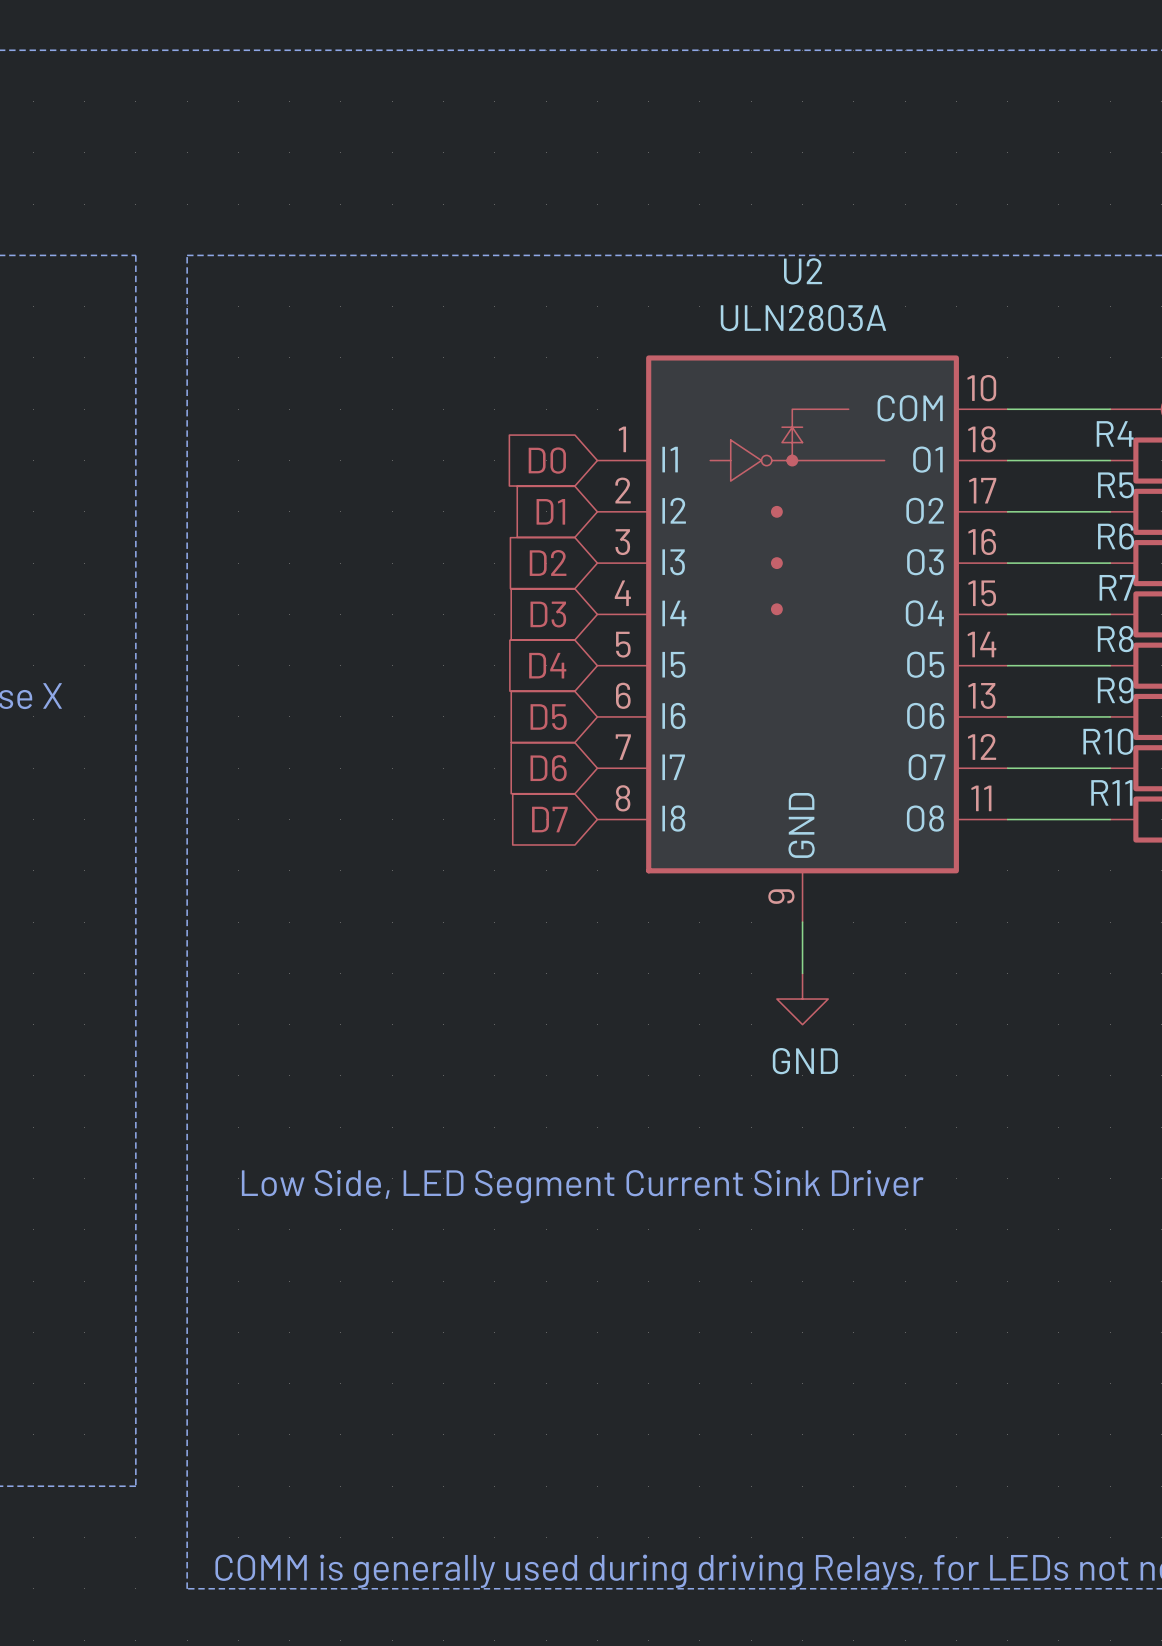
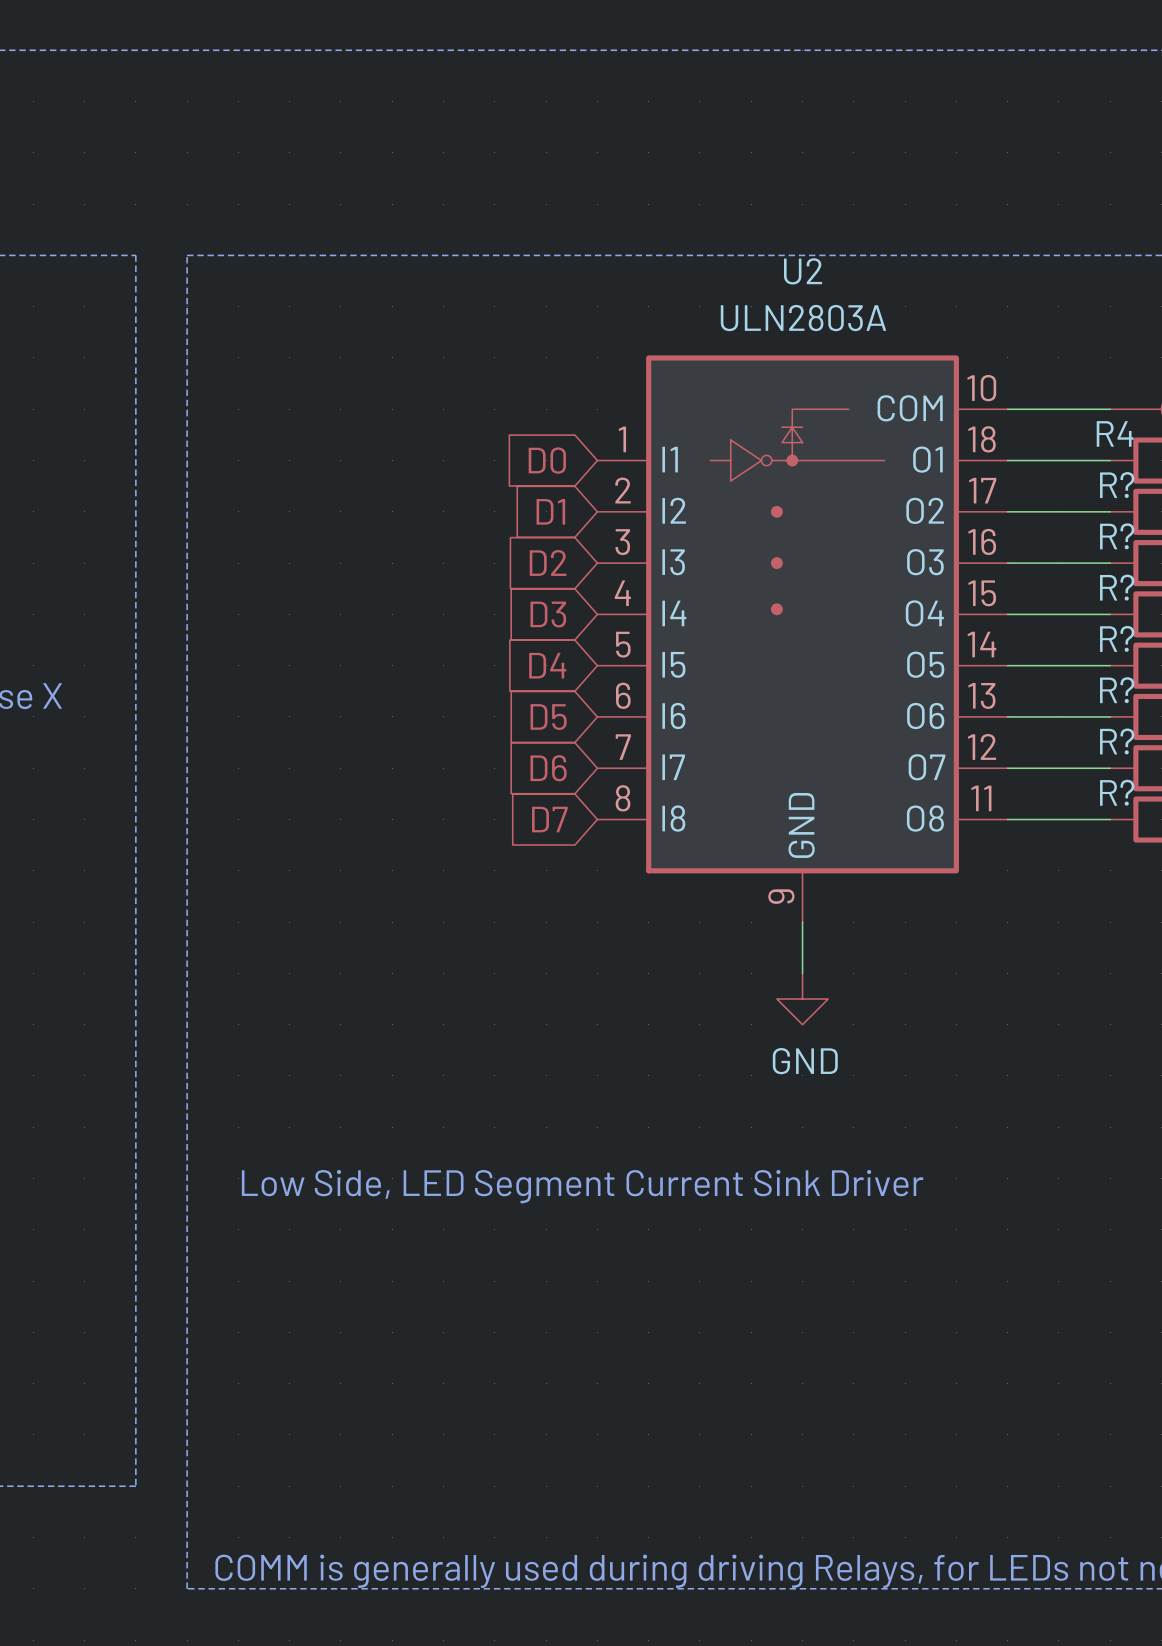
R5 name: R5 (1116, 485) -> R? (1117, 485)
R6 name: R6 (1116, 536) -> R? (1117, 536)
R7 name: R7 (1117, 587) -> R? (1117, 587)
R8 name: R8 (1115, 639) -> R? (1117, 638)
R9 name: R9 (1115, 690) -> R? (1117, 690)
R10 name: R10 (1108, 741) -> R? (1117, 741)
R11 name: R11 (1111, 792) -> R? (1117, 792)

